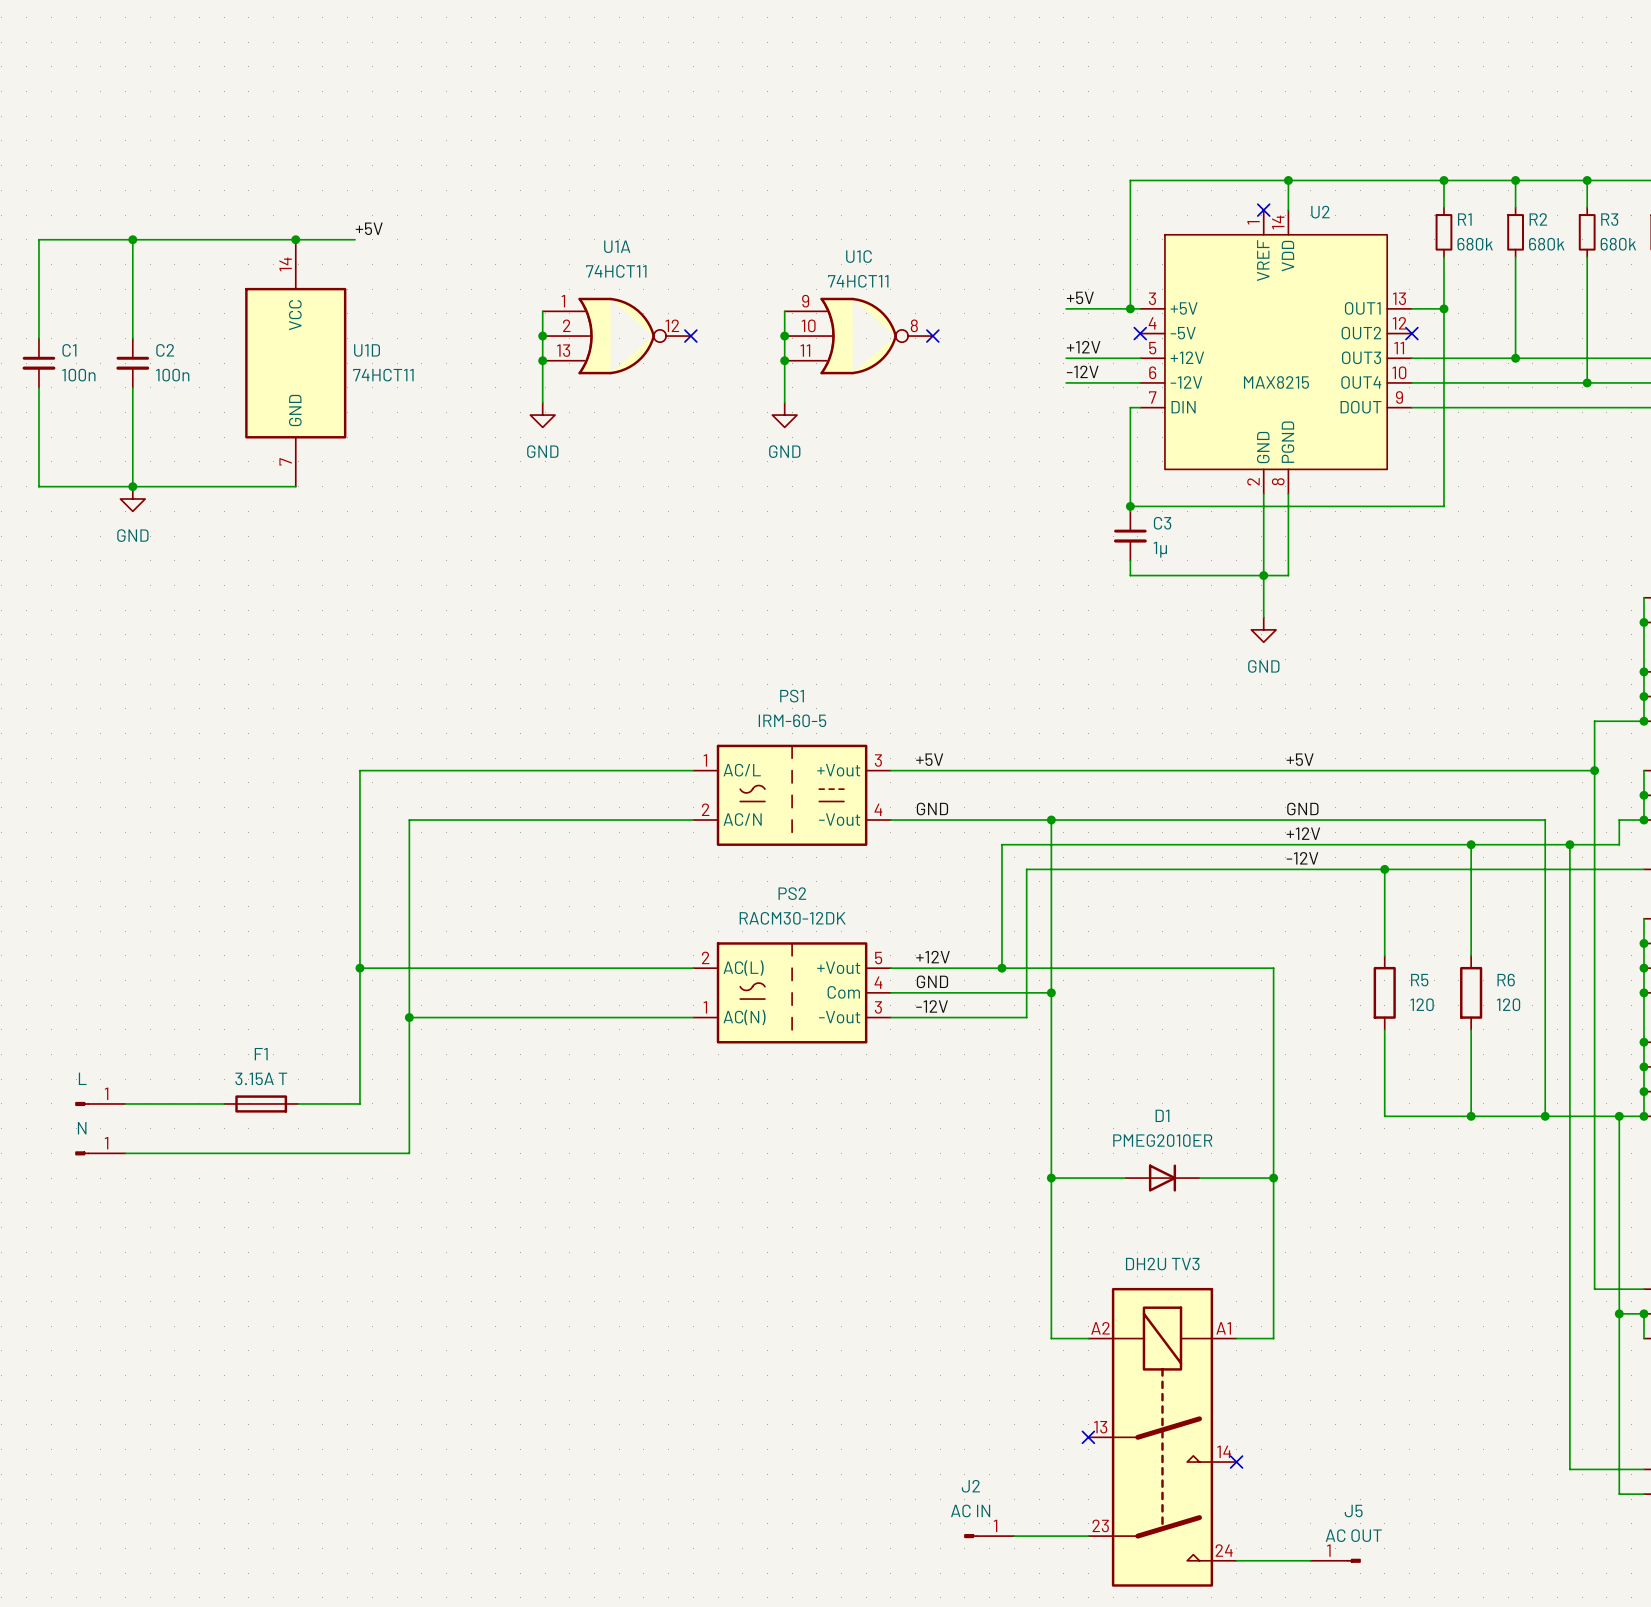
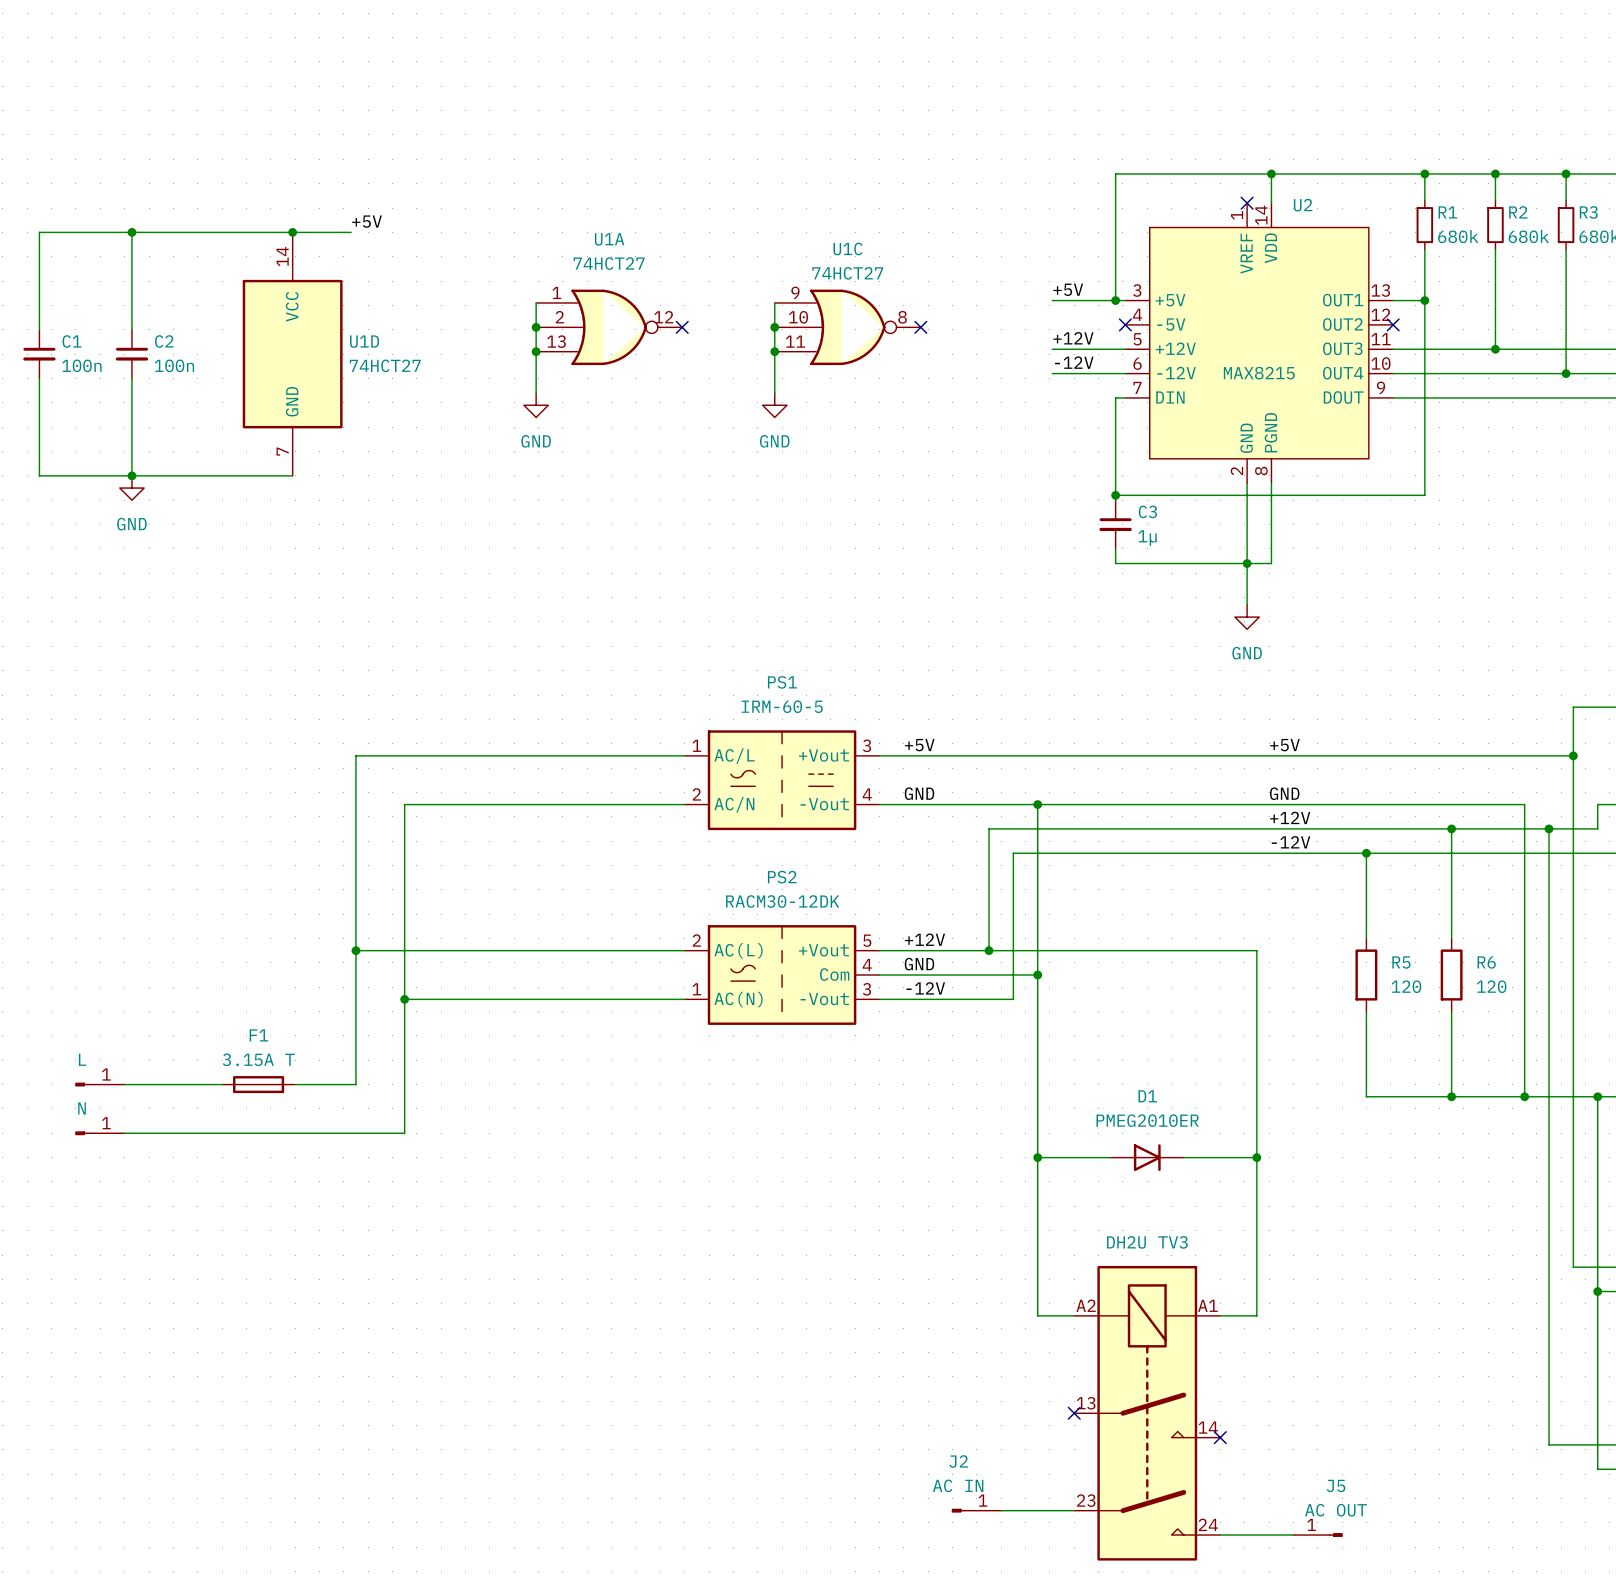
U1A value: 74HCT11 (616, 271) -> 74HCT27 (609, 263)
U1C value: 74HCT11 (858, 281) -> 74HCT27 (847, 273)
U1D value: 74HCT11 (383, 375) -> 74HCT27 (385, 365)

